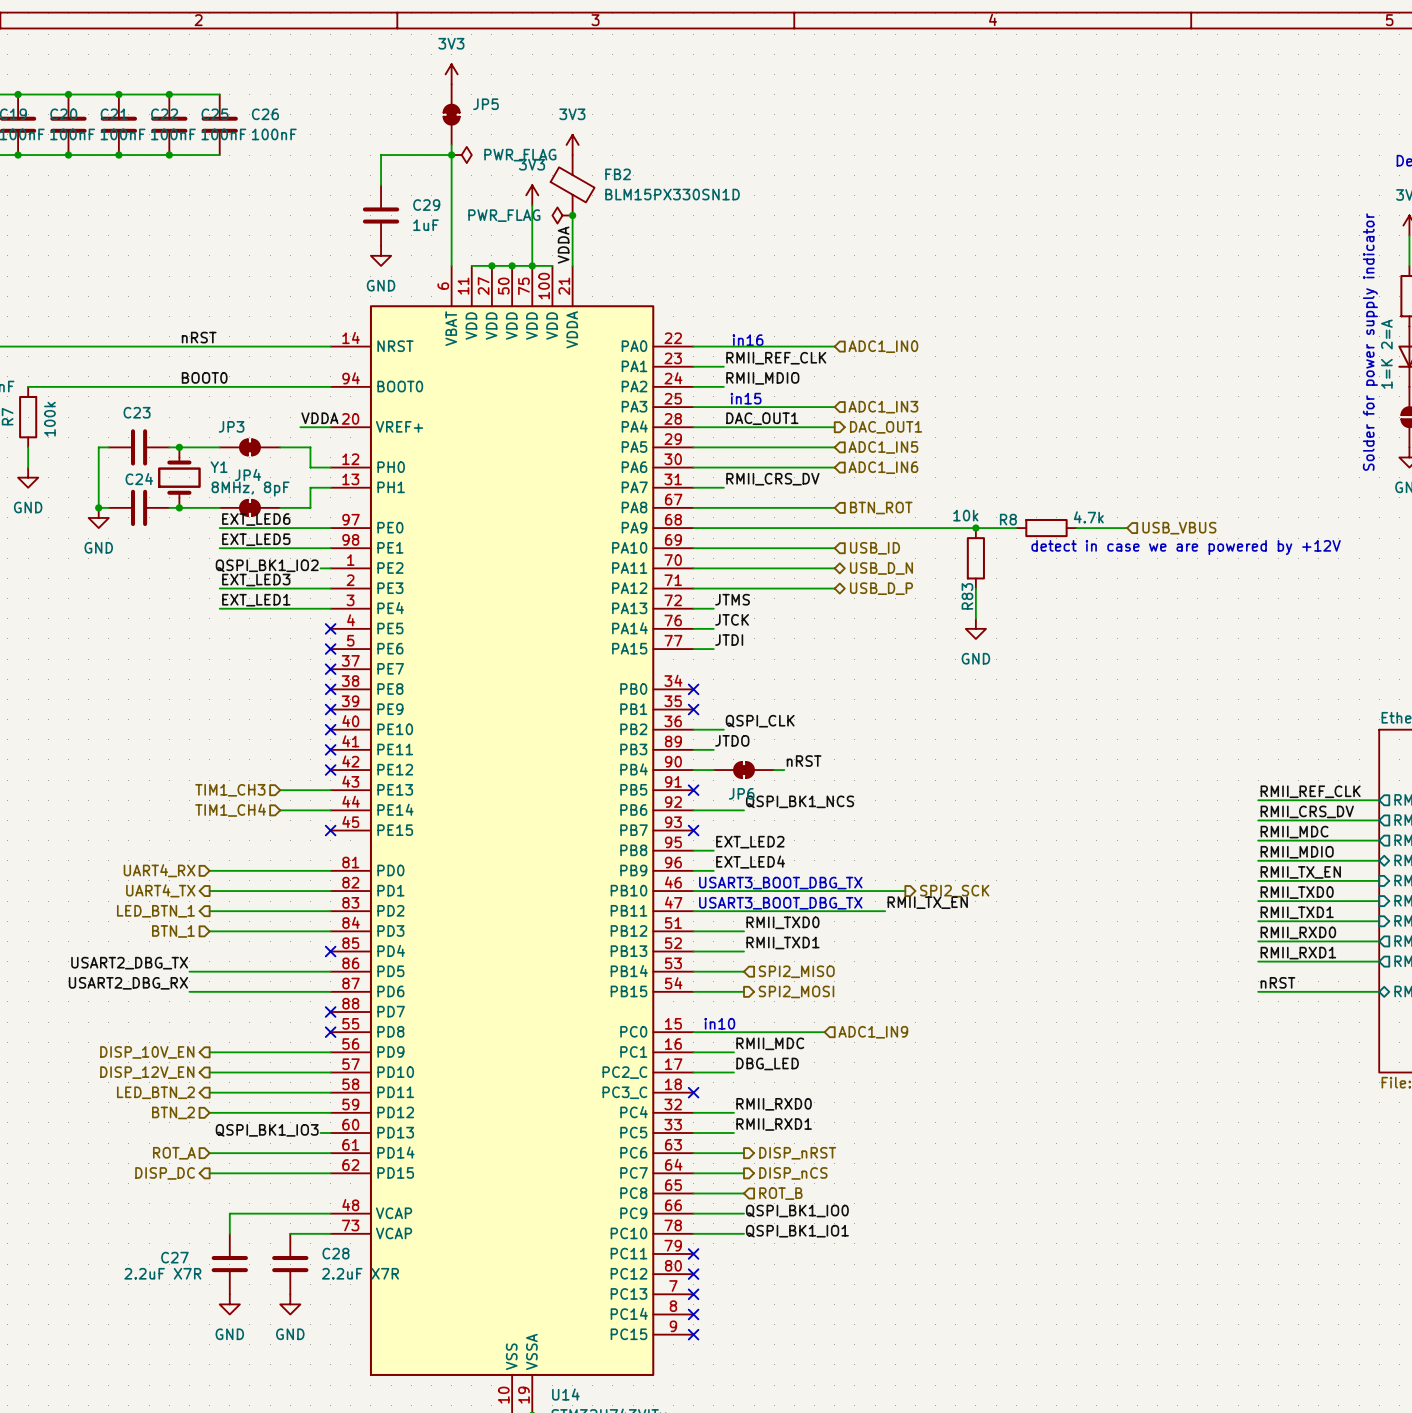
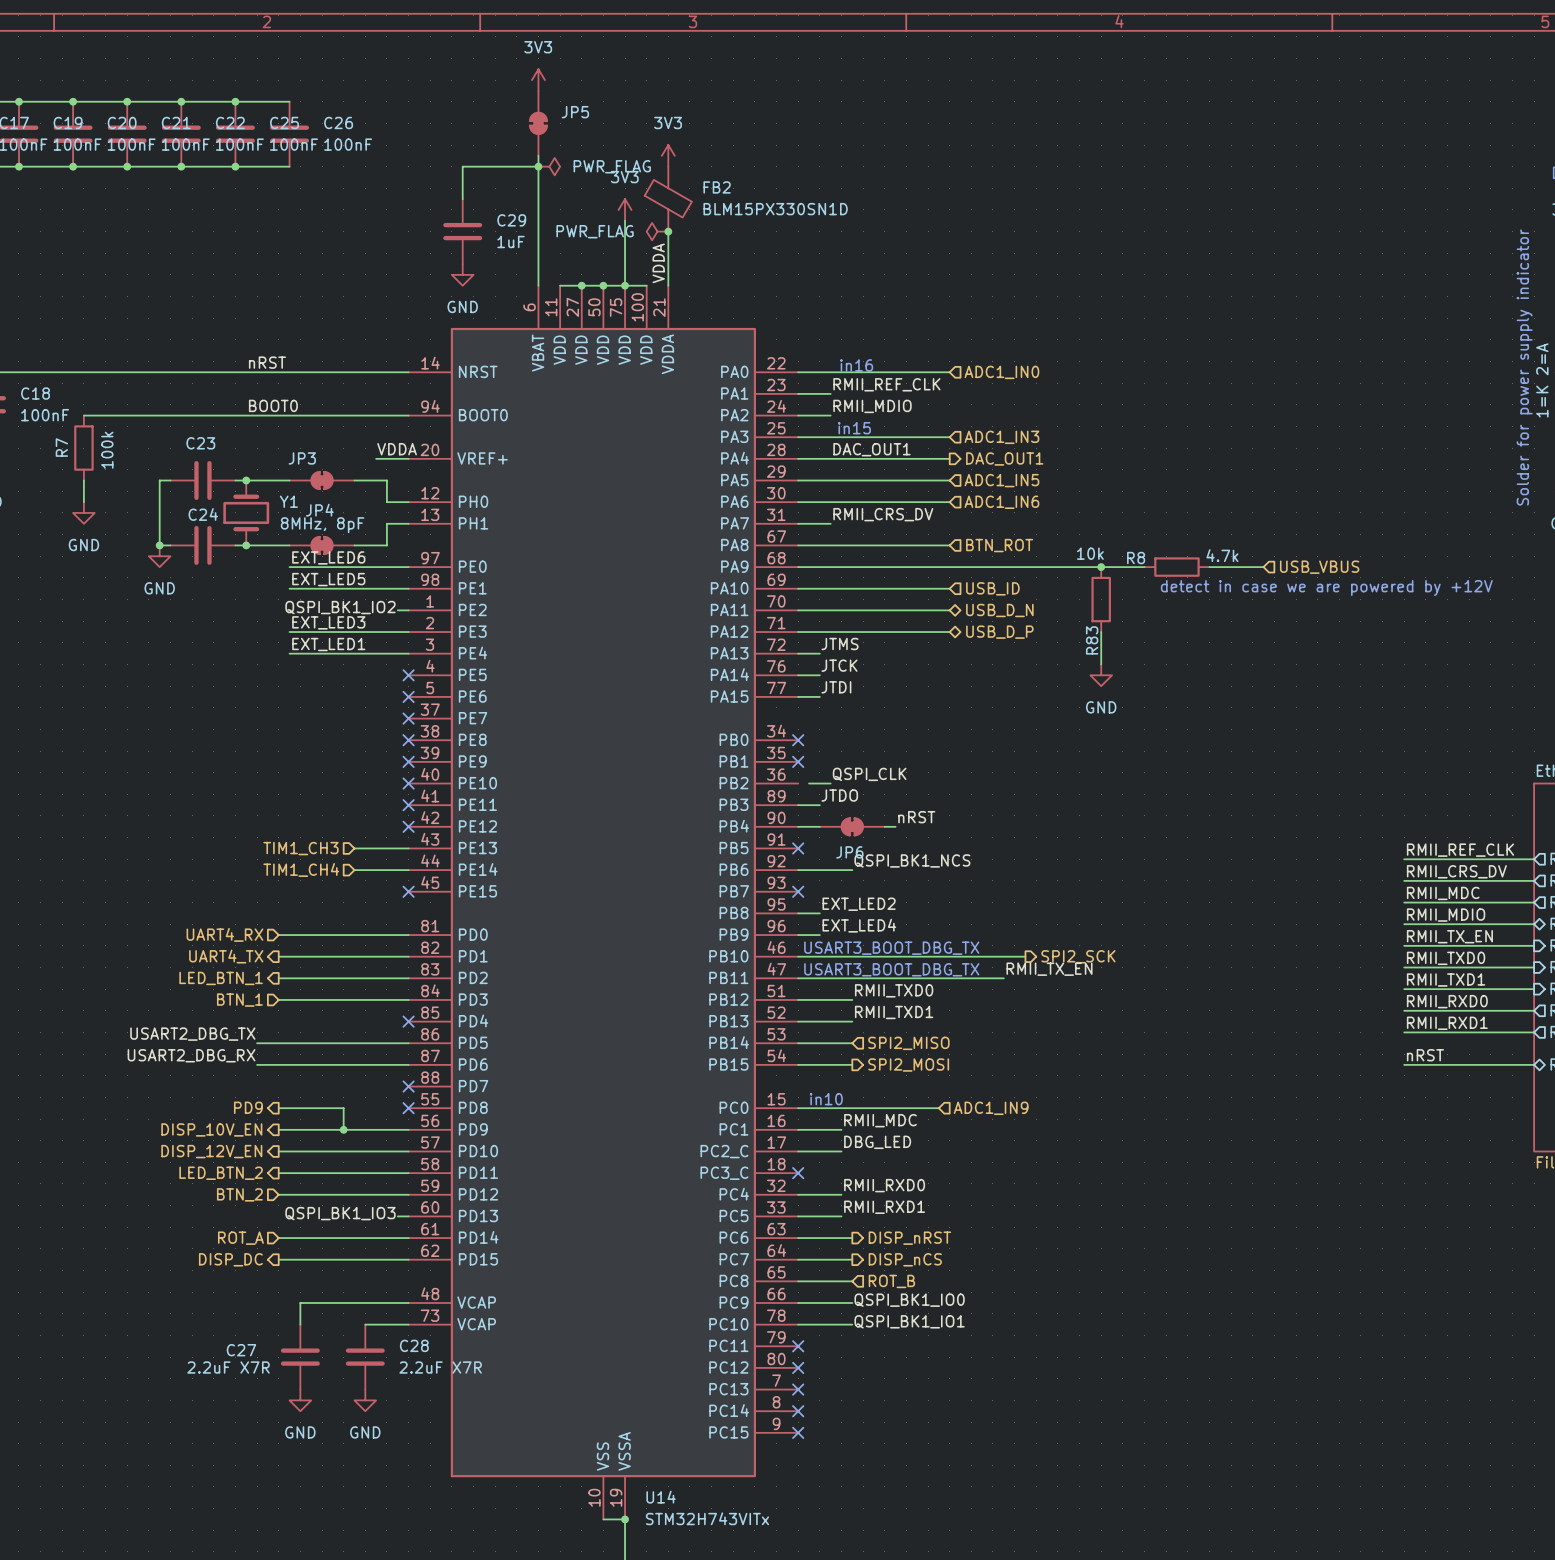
wire: (693, 729) (703, 729) -> none
hierarchical label: none -> PD9 (248, 1107)
wire: none -> (278, 1108) (343, 1108) (343, 1129)
junction: none -> (343, 1129)

